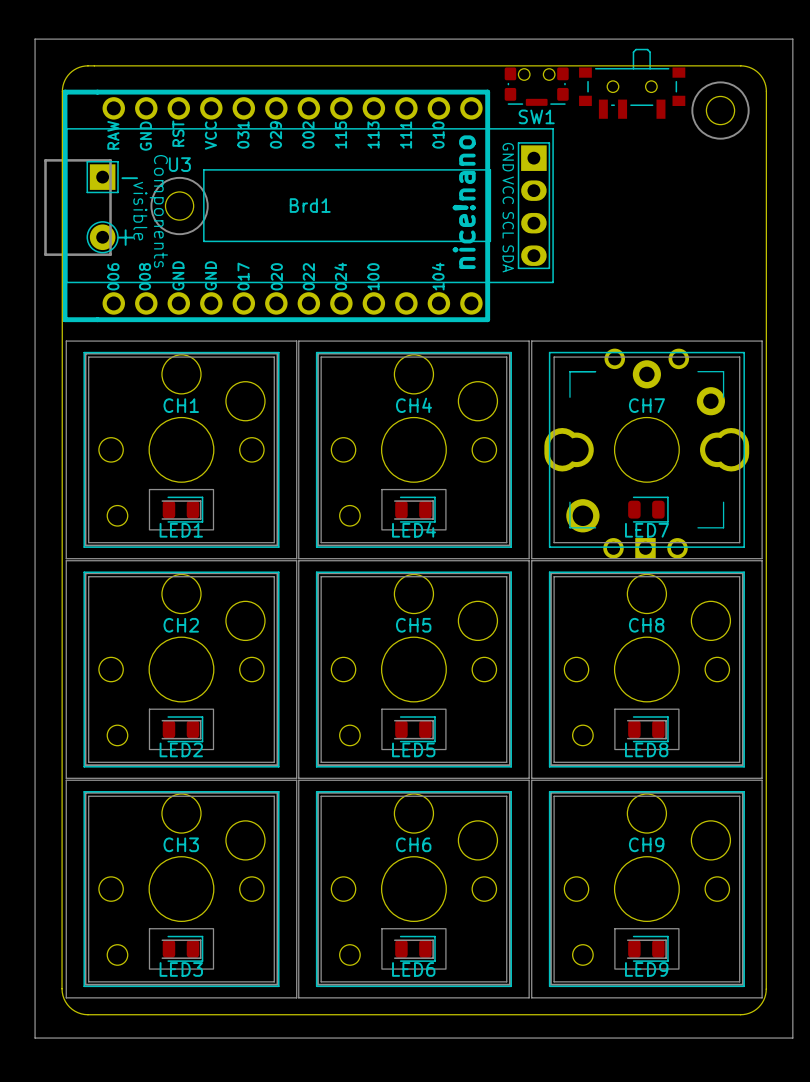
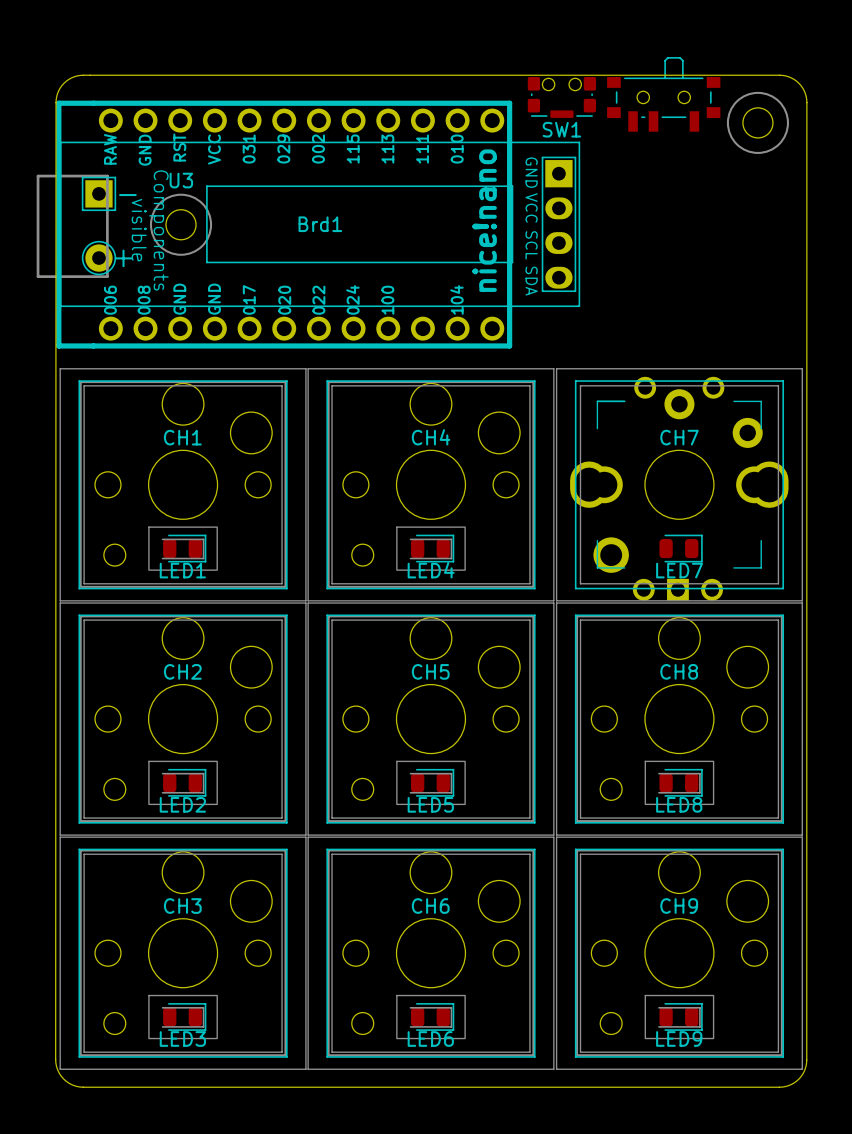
line: (35, 39) (792, 39) (792, 1038) (35, 1038) (35, 39) -> none

